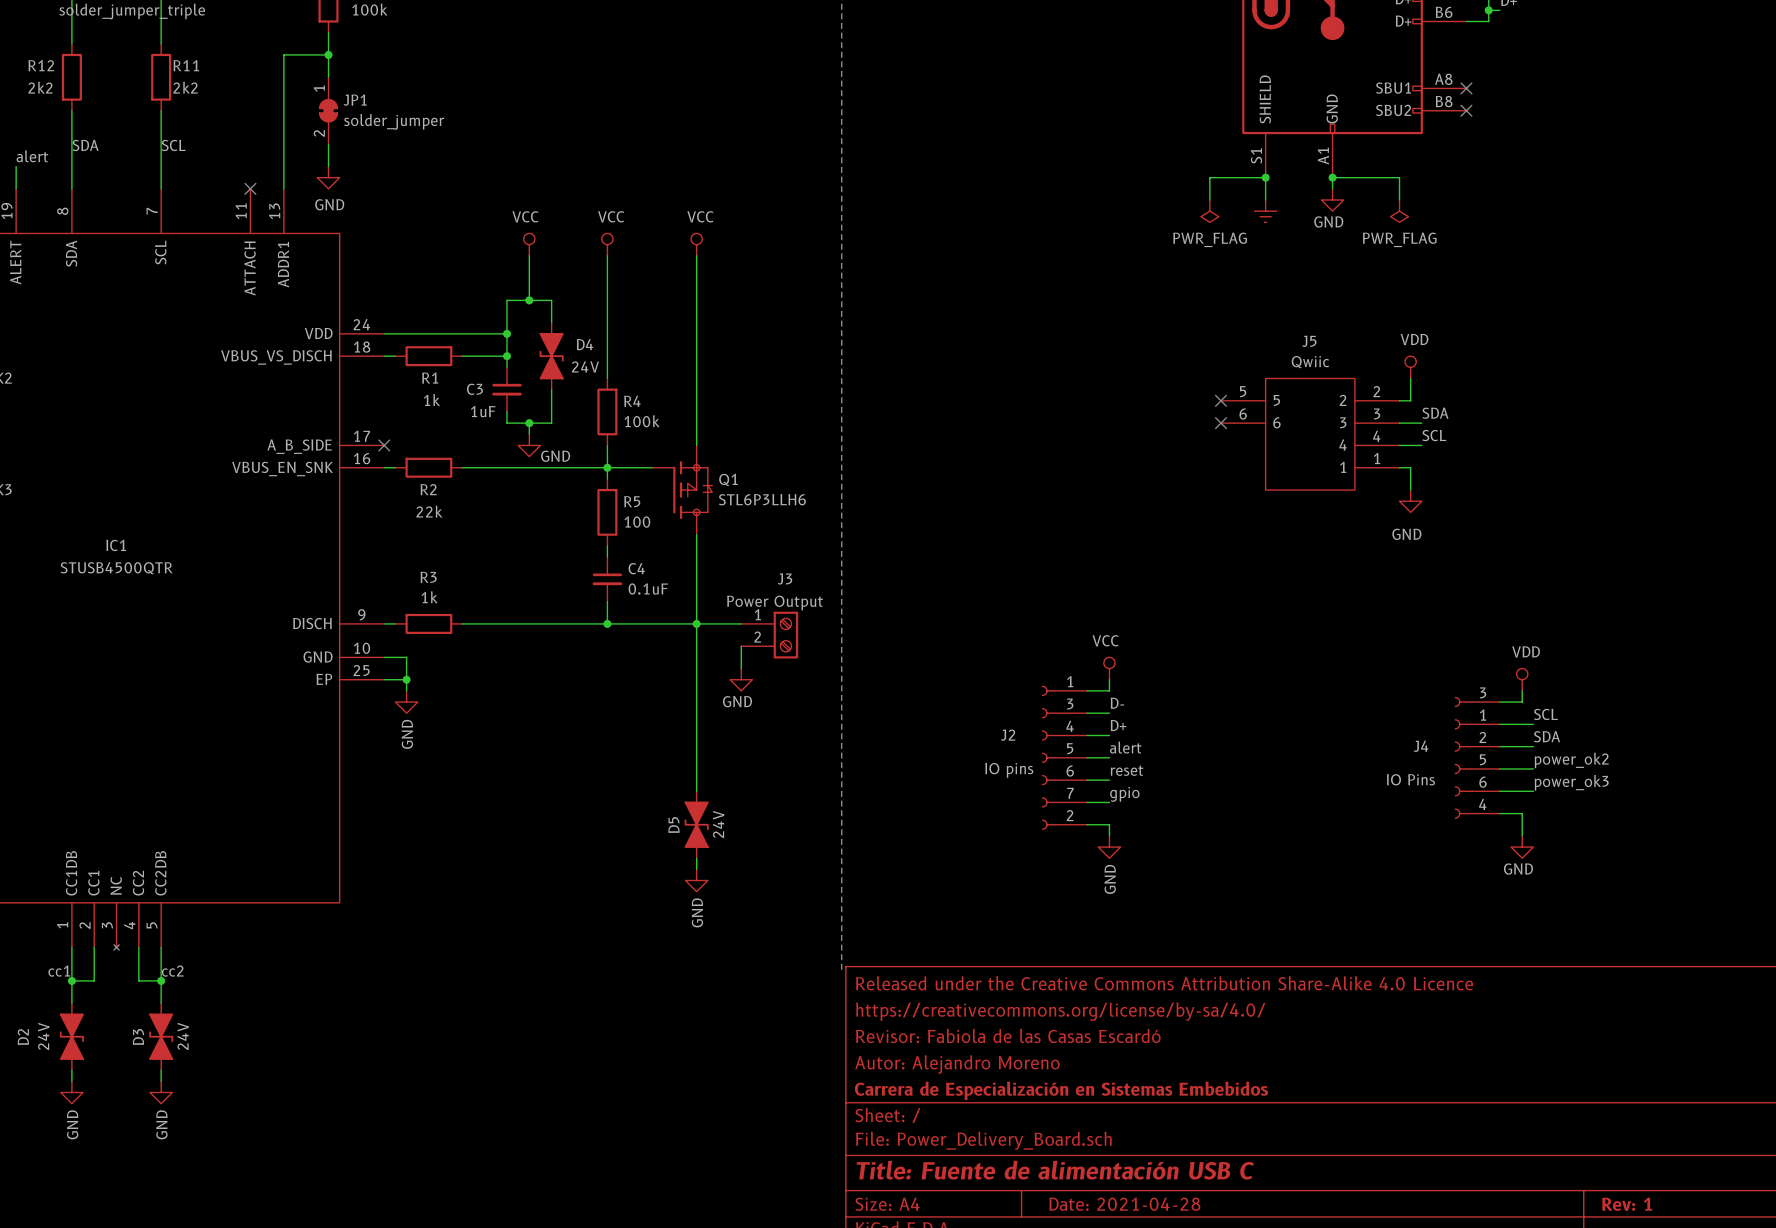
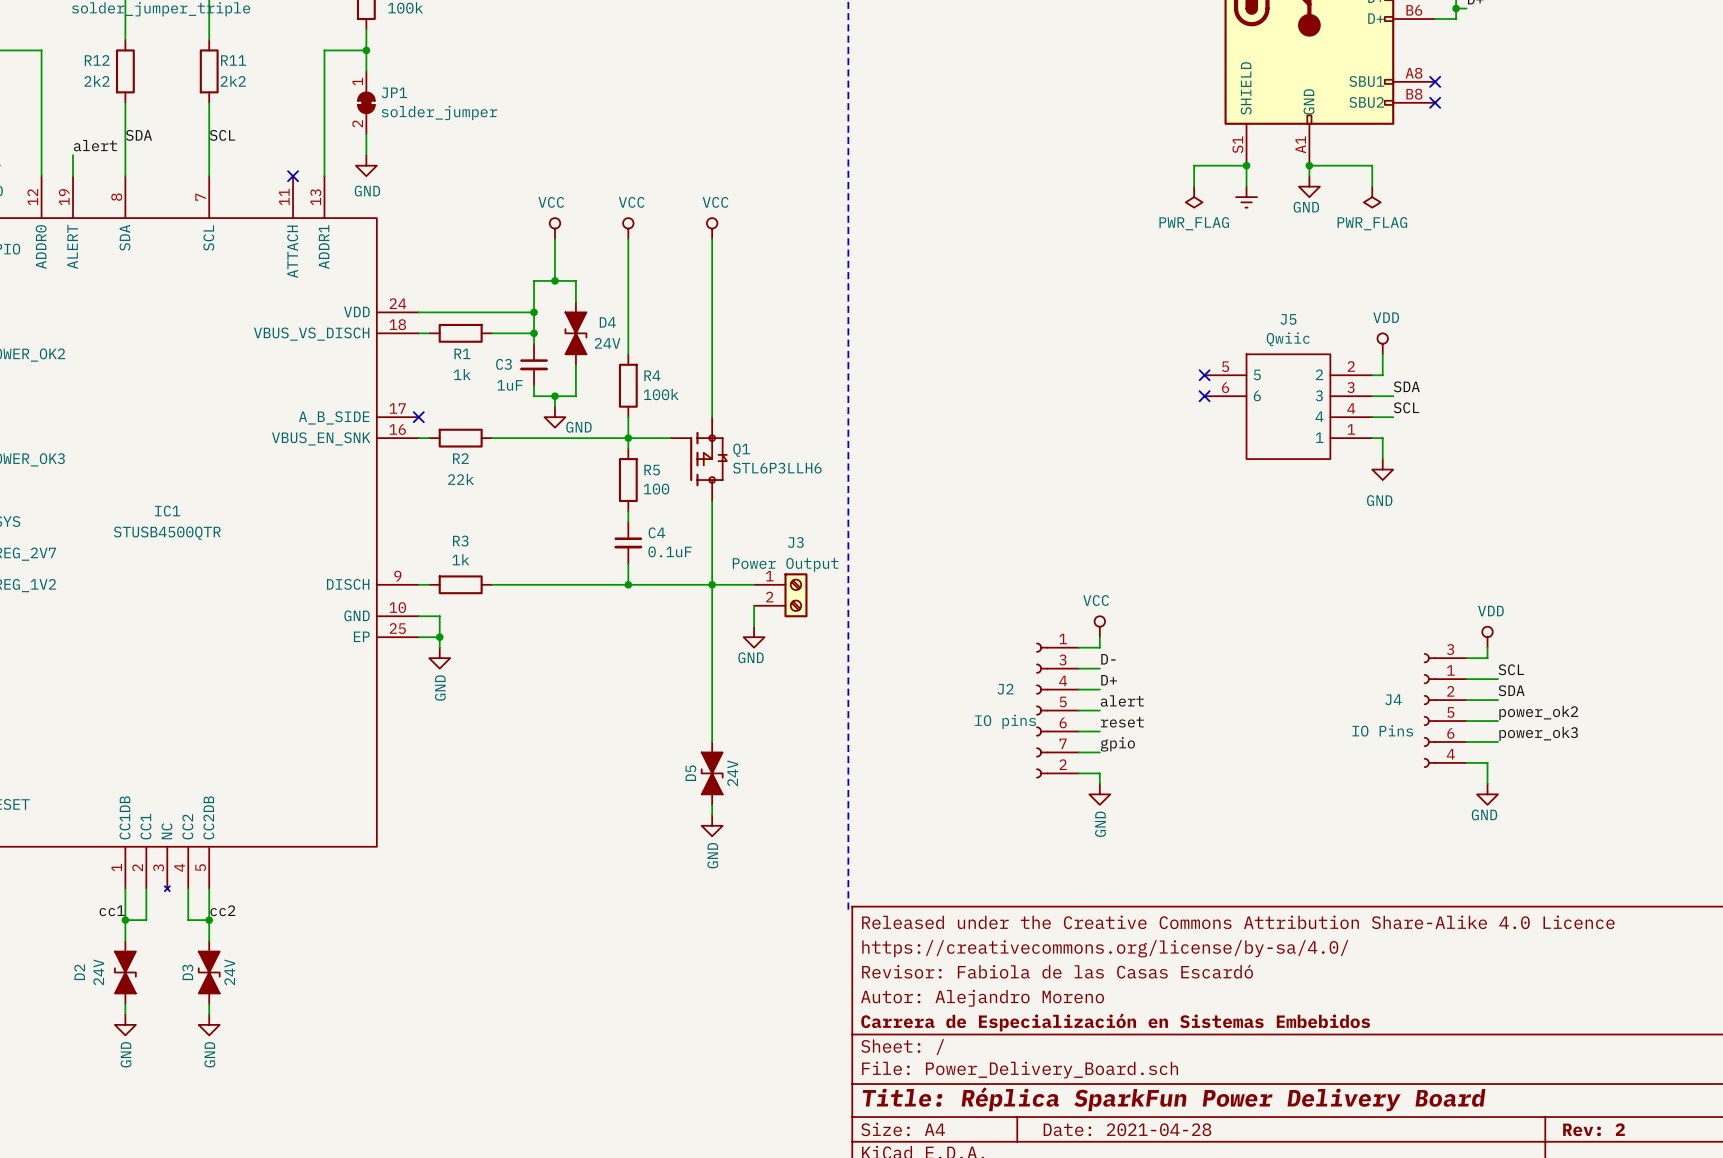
title block: Title: Fuente de alimentación USB C (1055, 1170) -> Title: Réplica SparkFun Power Delivery Board (1174, 1099)
title block: Rev: 1 (1627, 1204) -> Rev: 2 (1593, 1129)

